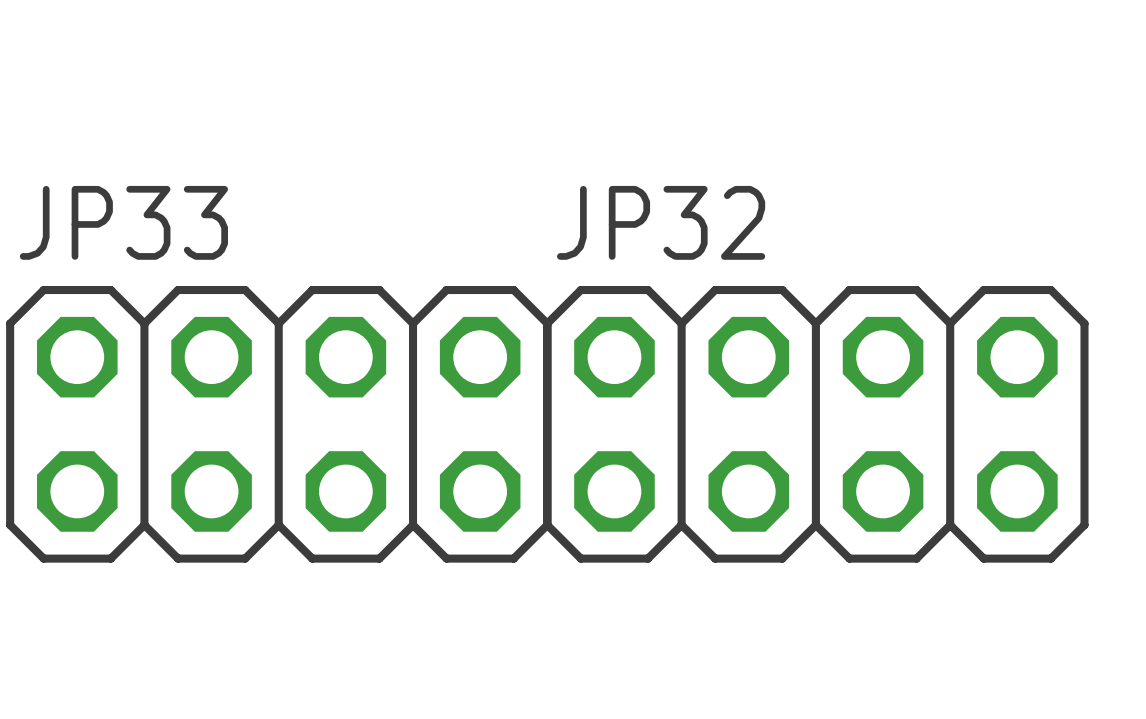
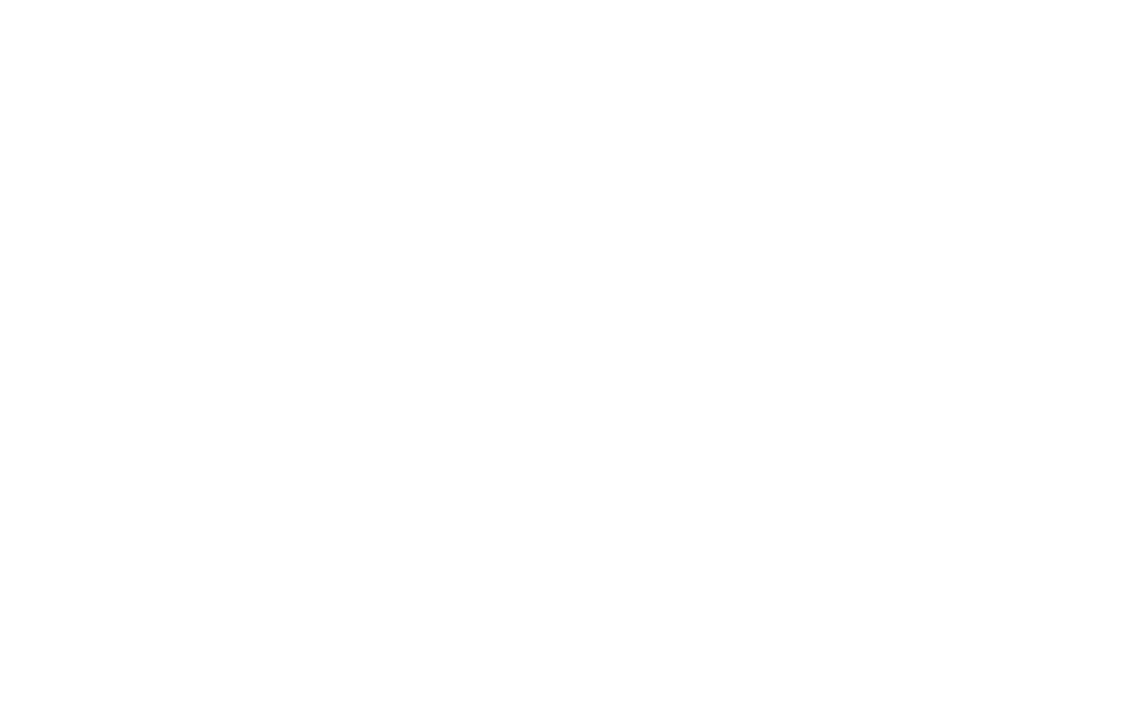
JP33: (278, 424) -> none
JP32: (815, 424) -> none

